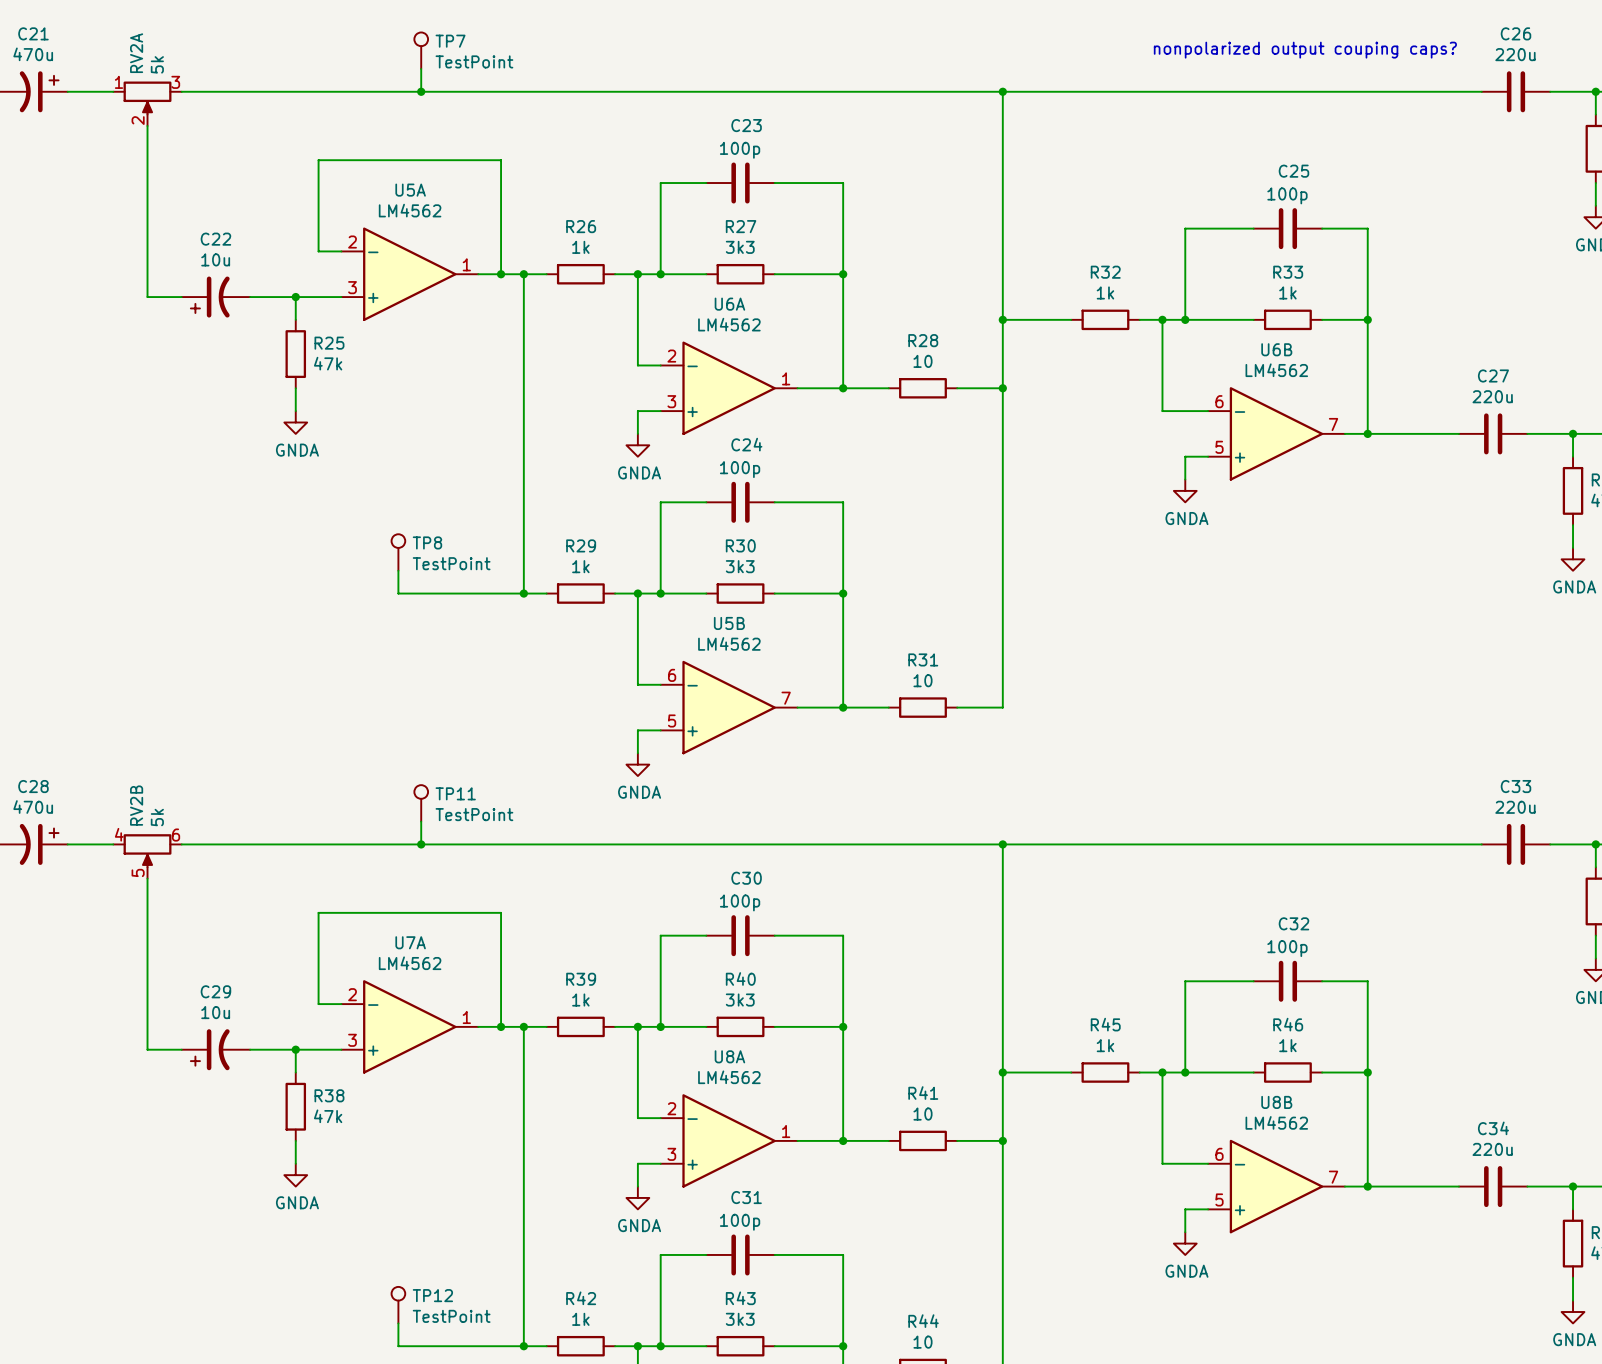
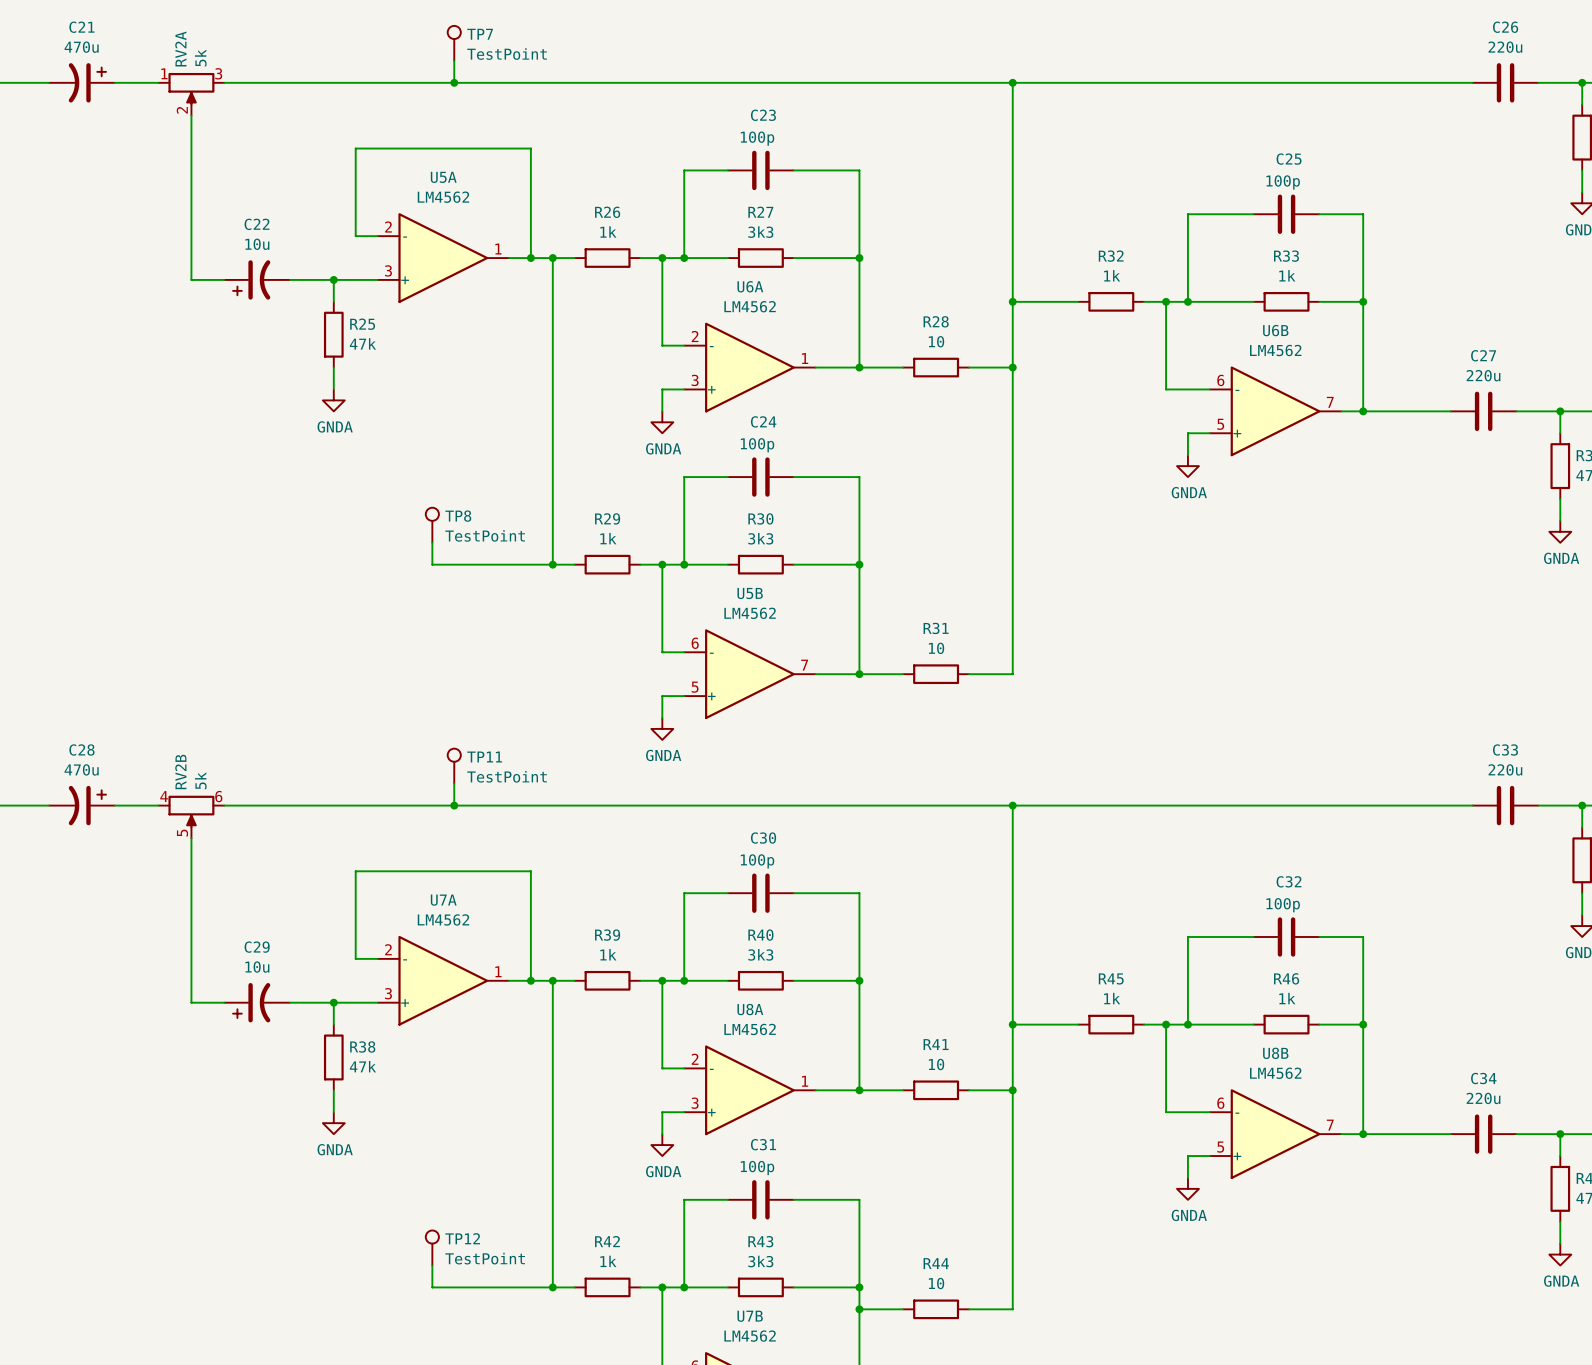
text: nonpolarized output couping caps? (1305, 50) -> none

